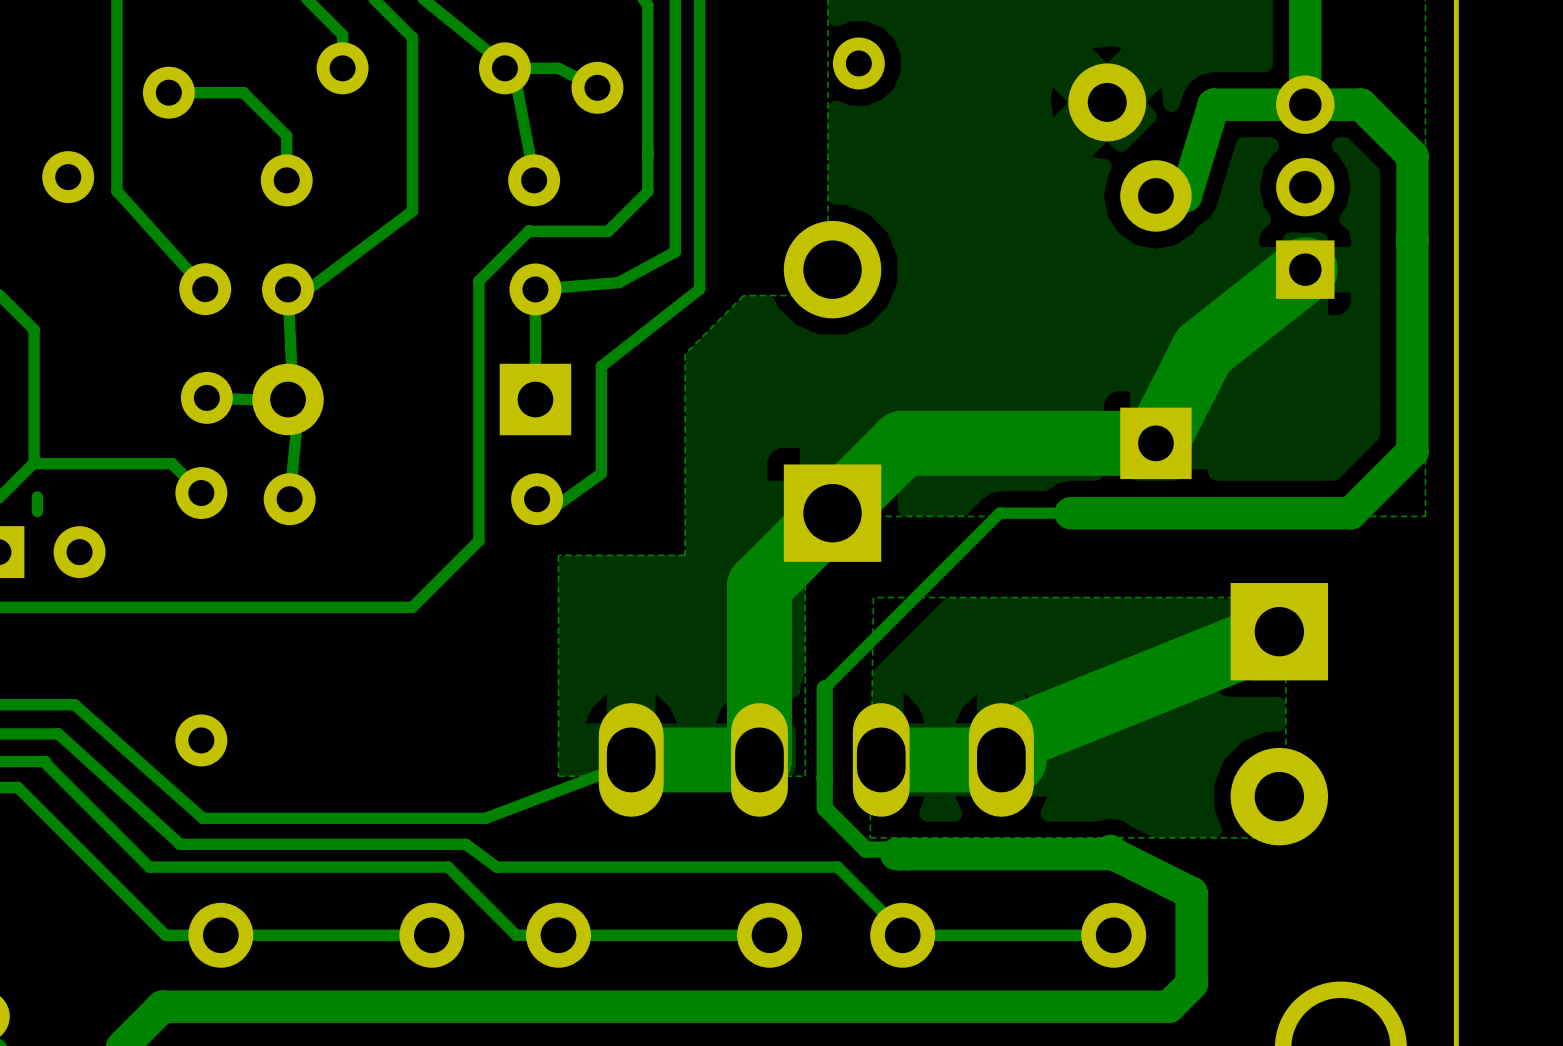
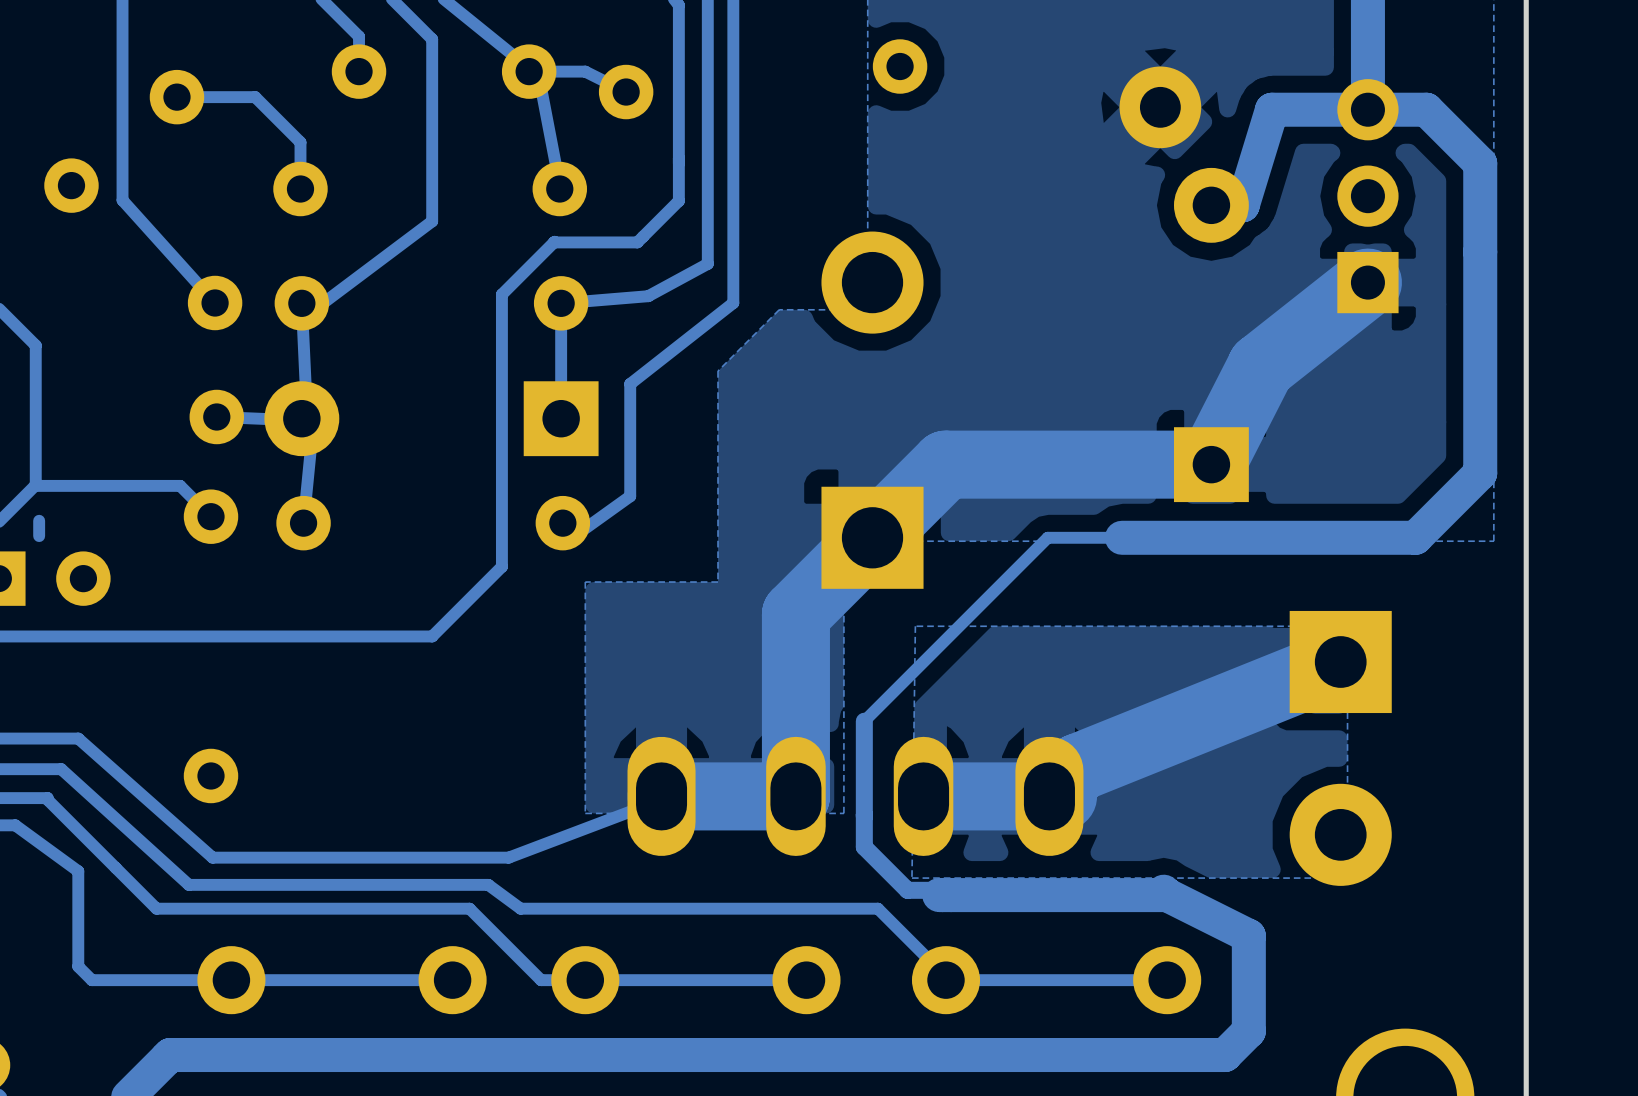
track: (14, 787) (17, 787) (165, 935) -> (15, 825) (78, 871) (78, 966) (91, 980) (173, 980)

